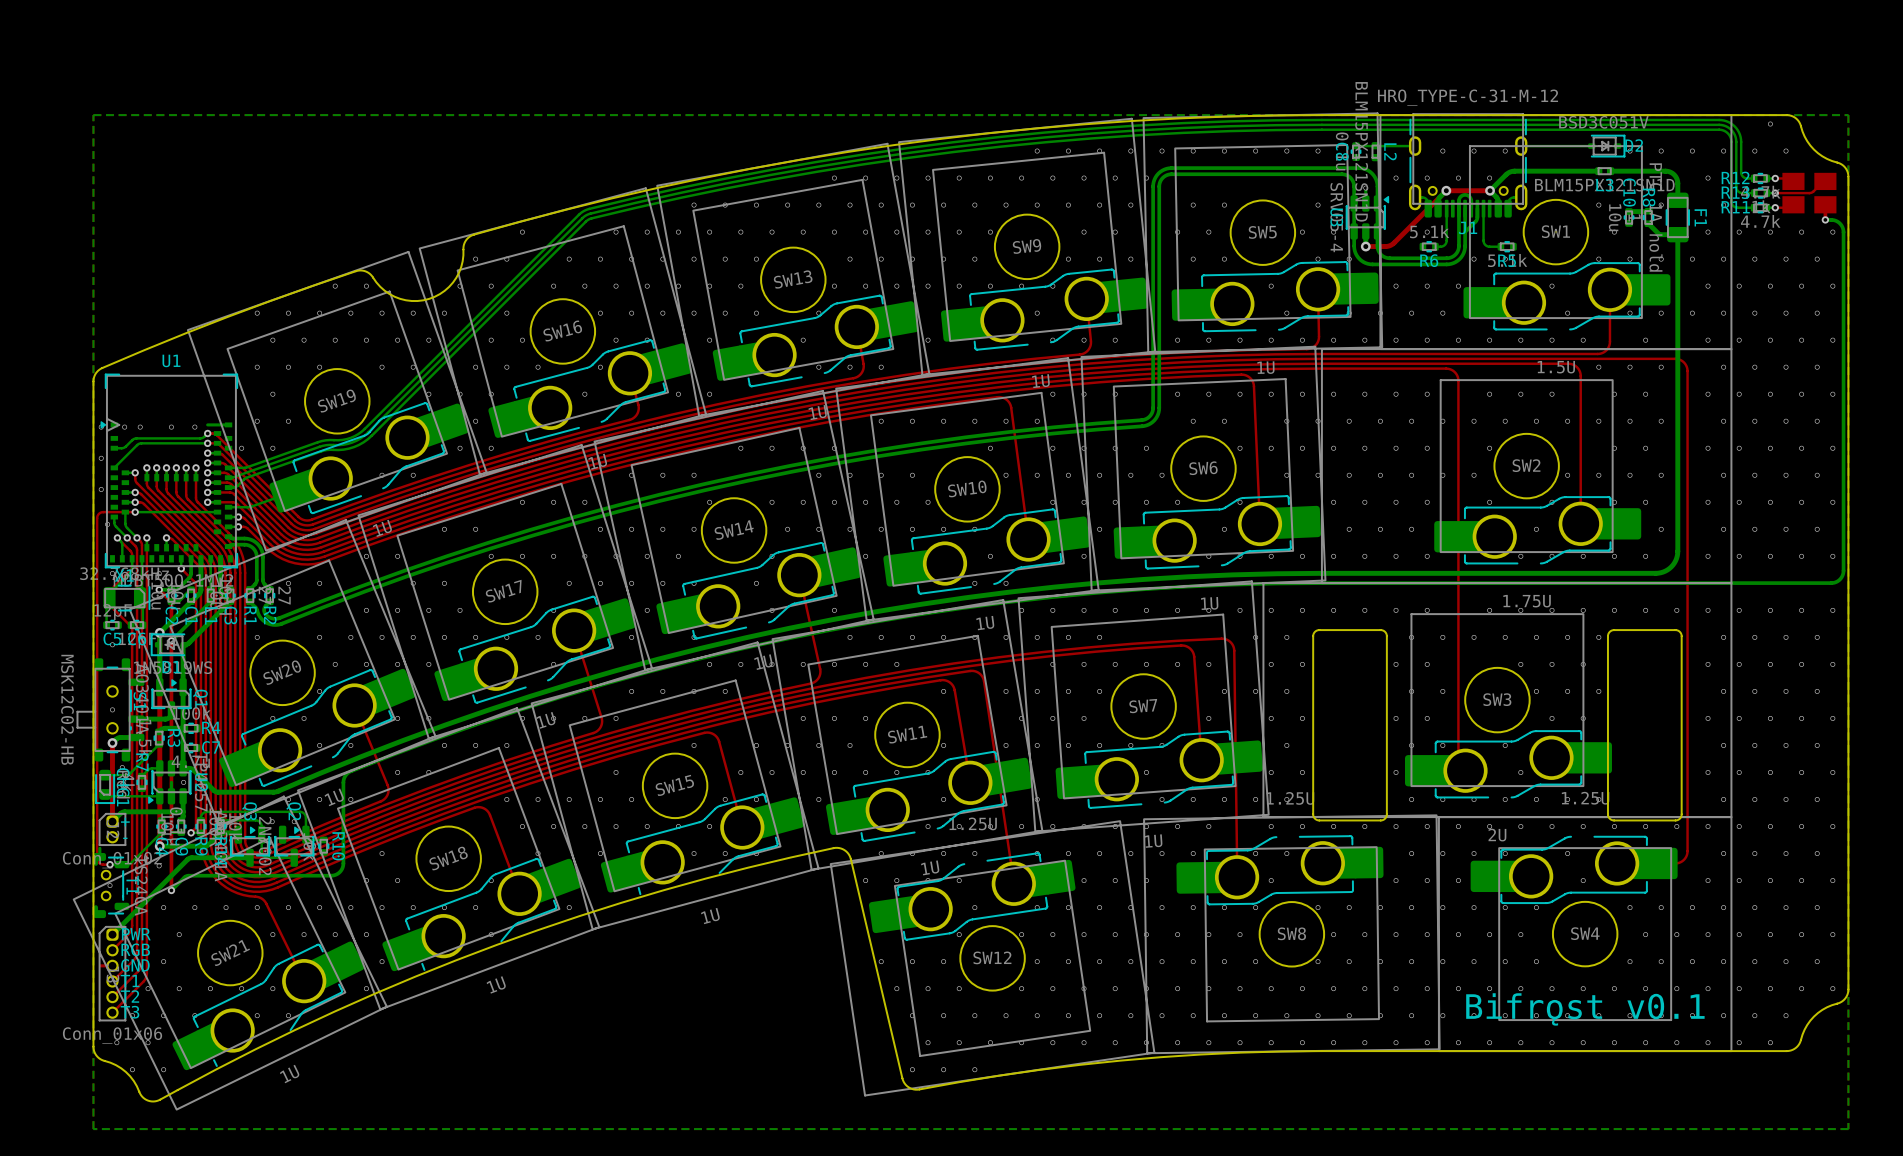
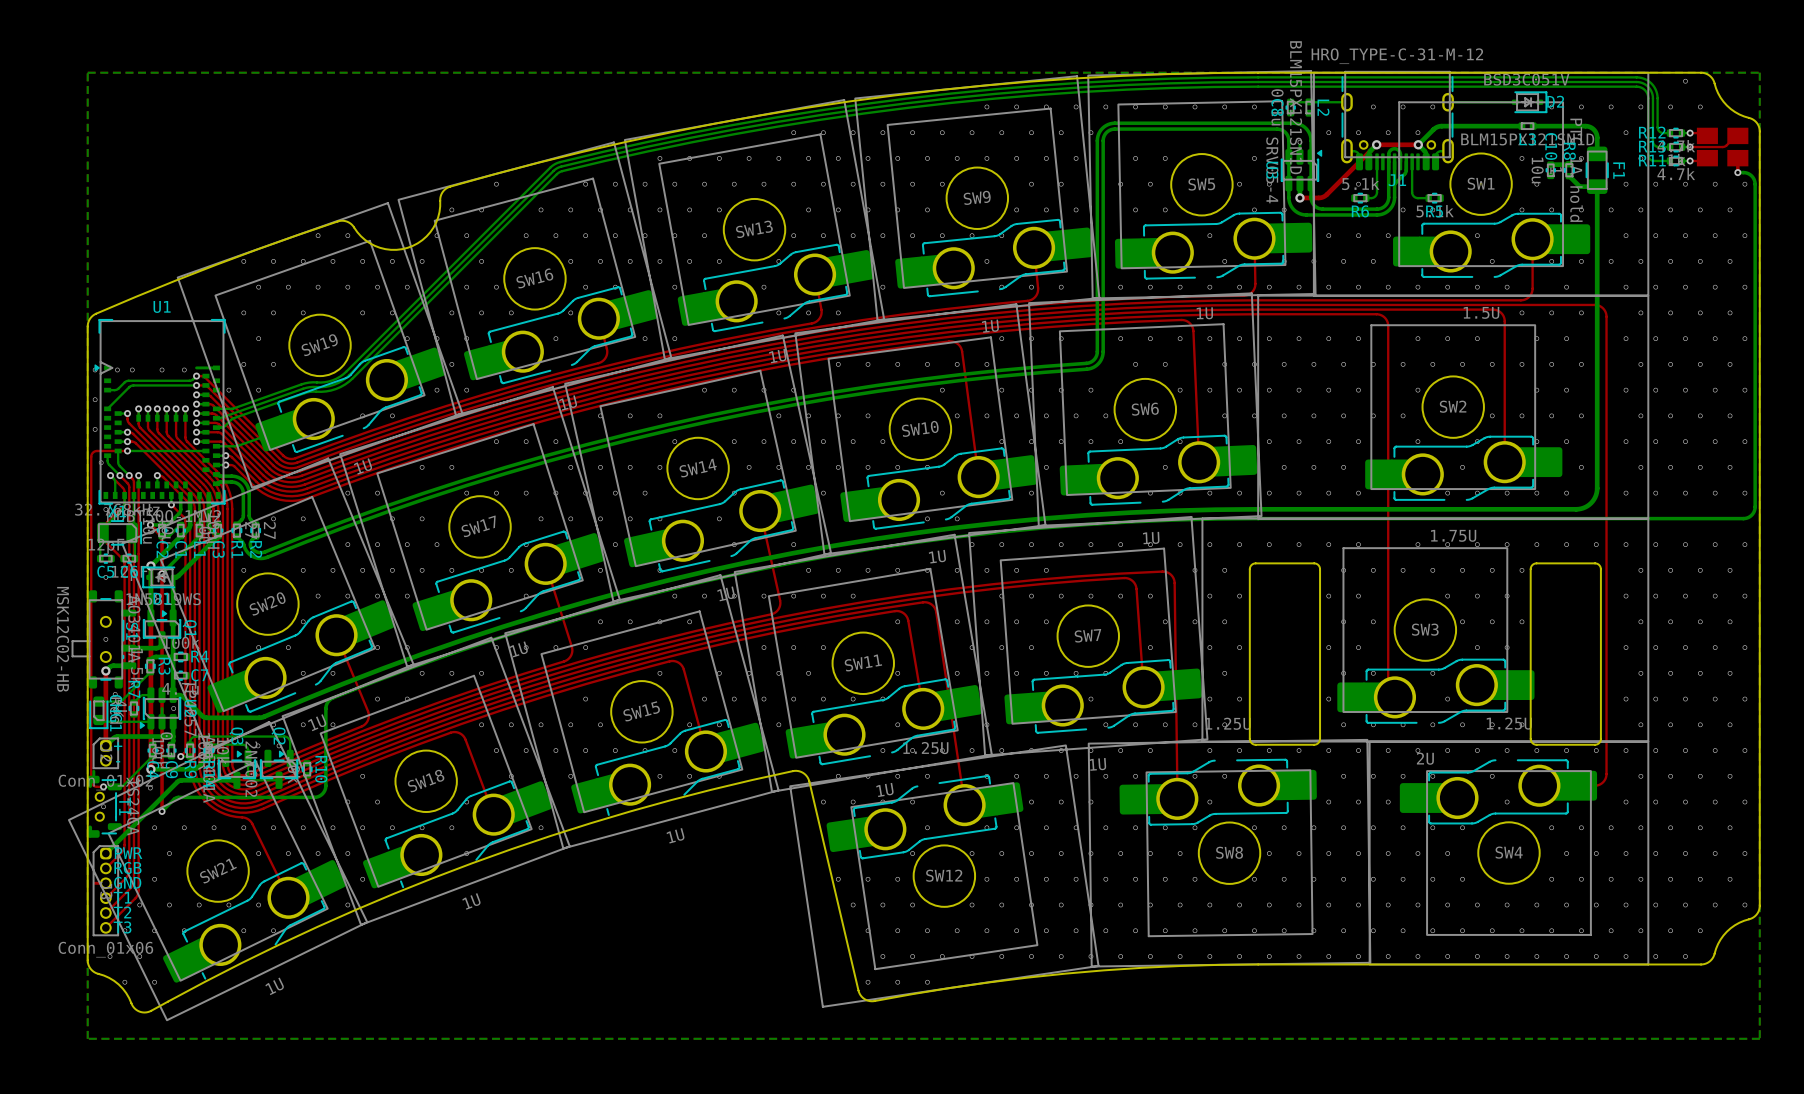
text: Bifrǫst v0.1 (1585, 1009) -> none

